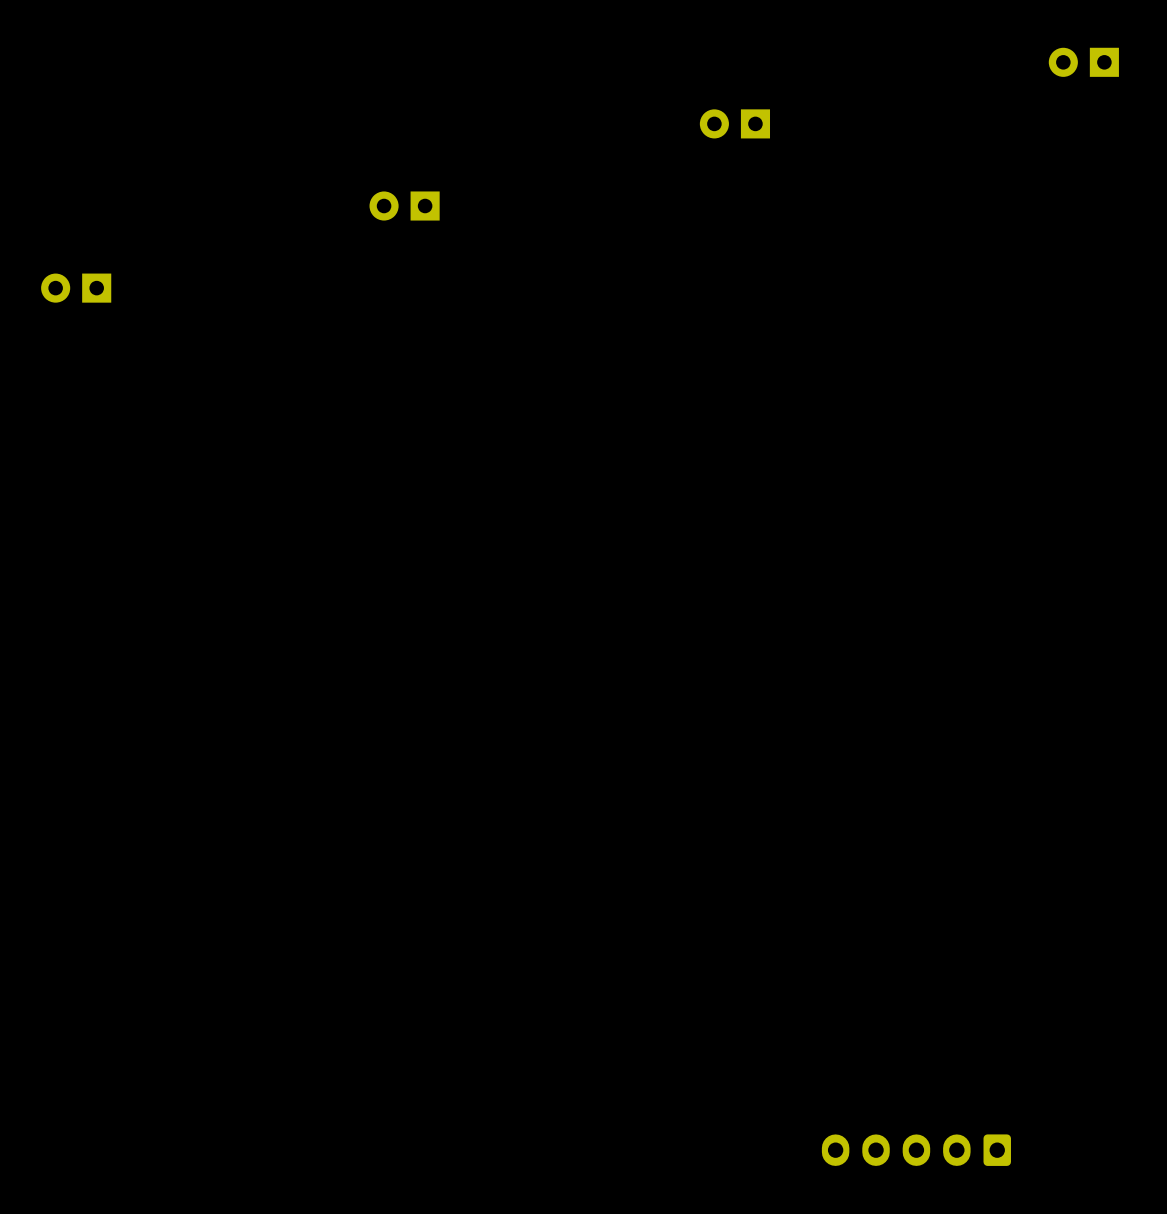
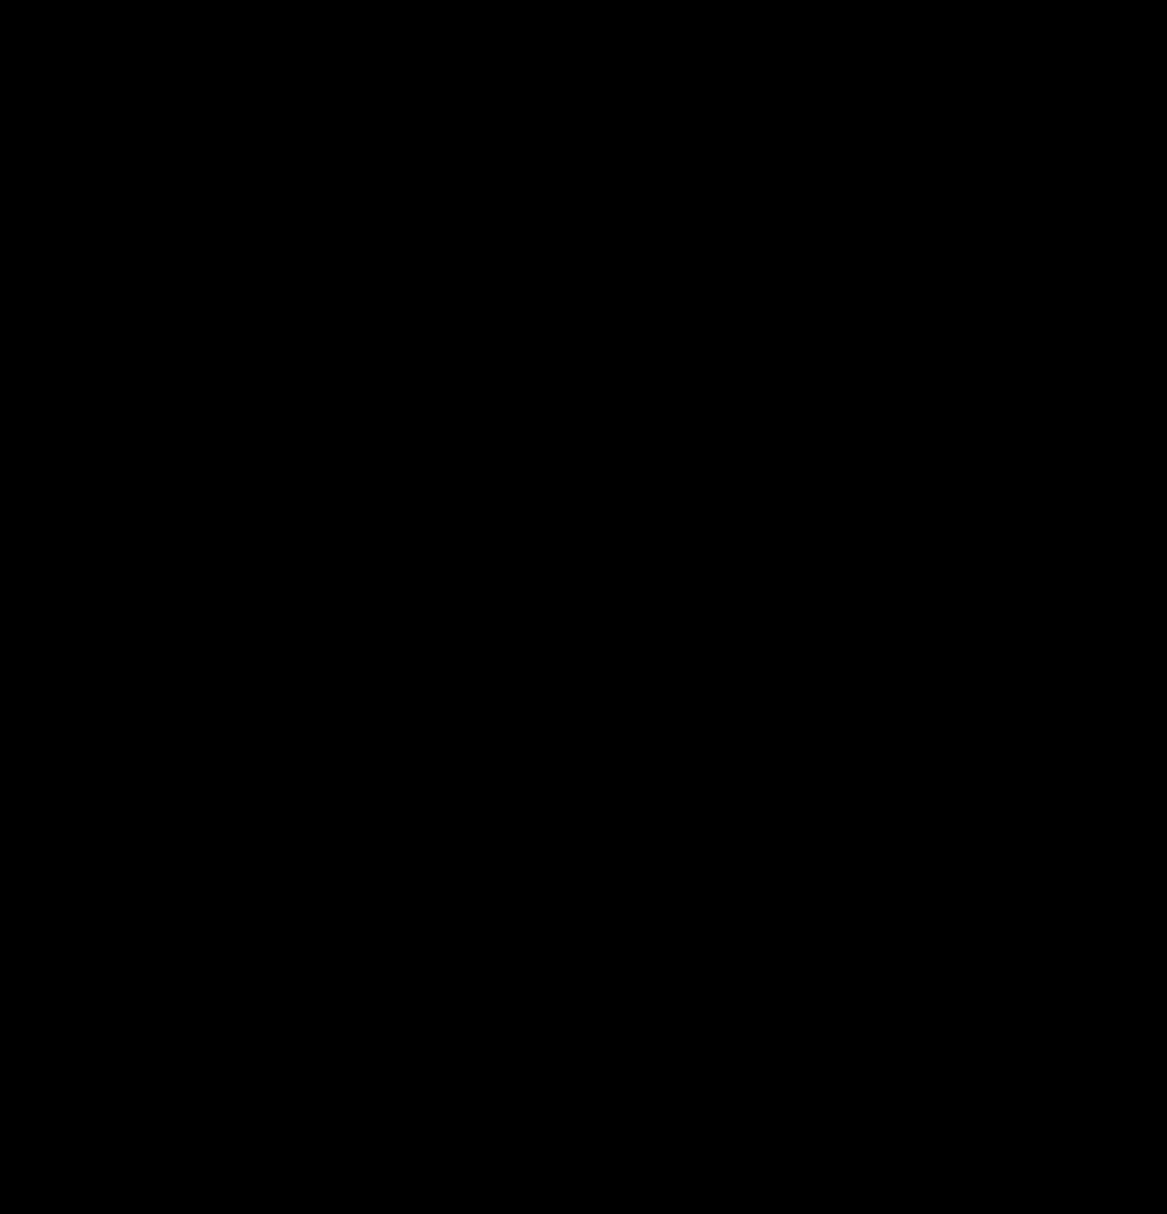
part: (1083, 62) -> none
part: (734, 123) -> none
part: (404, 206) -> none
part: (76, 288) -> none
part: (916, 1150) -> none

